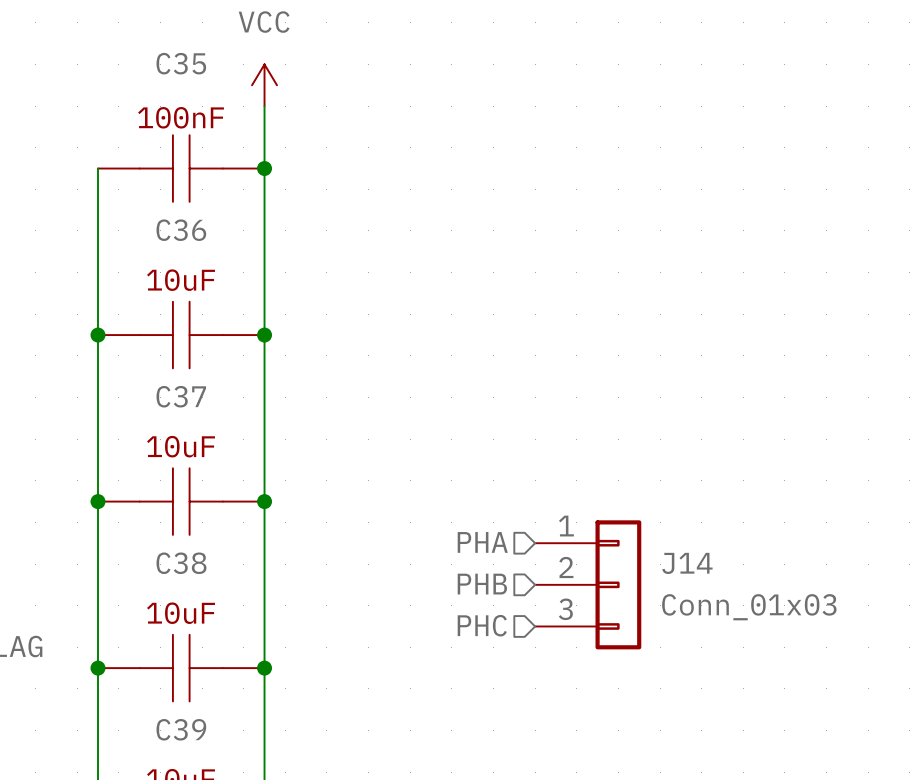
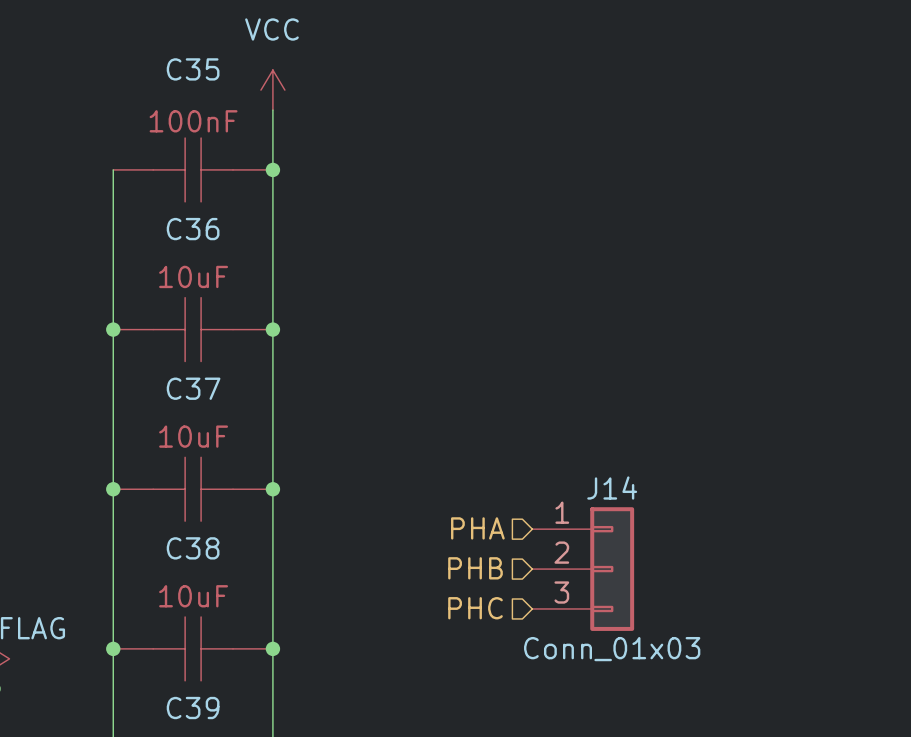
J14 name position: J14 (687, 563) -> J14 (612, 488)
J14 value position: Conn_01x03 (749, 607) -> Conn_01x03 (612, 649)

